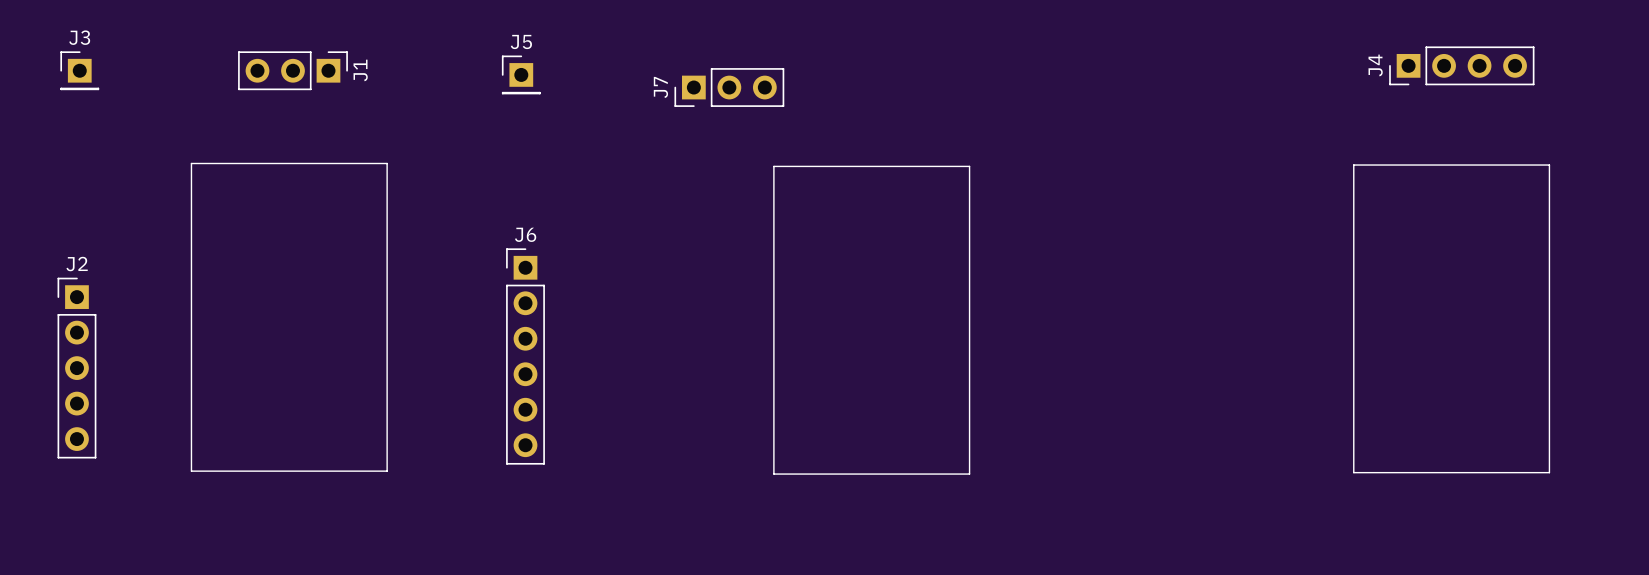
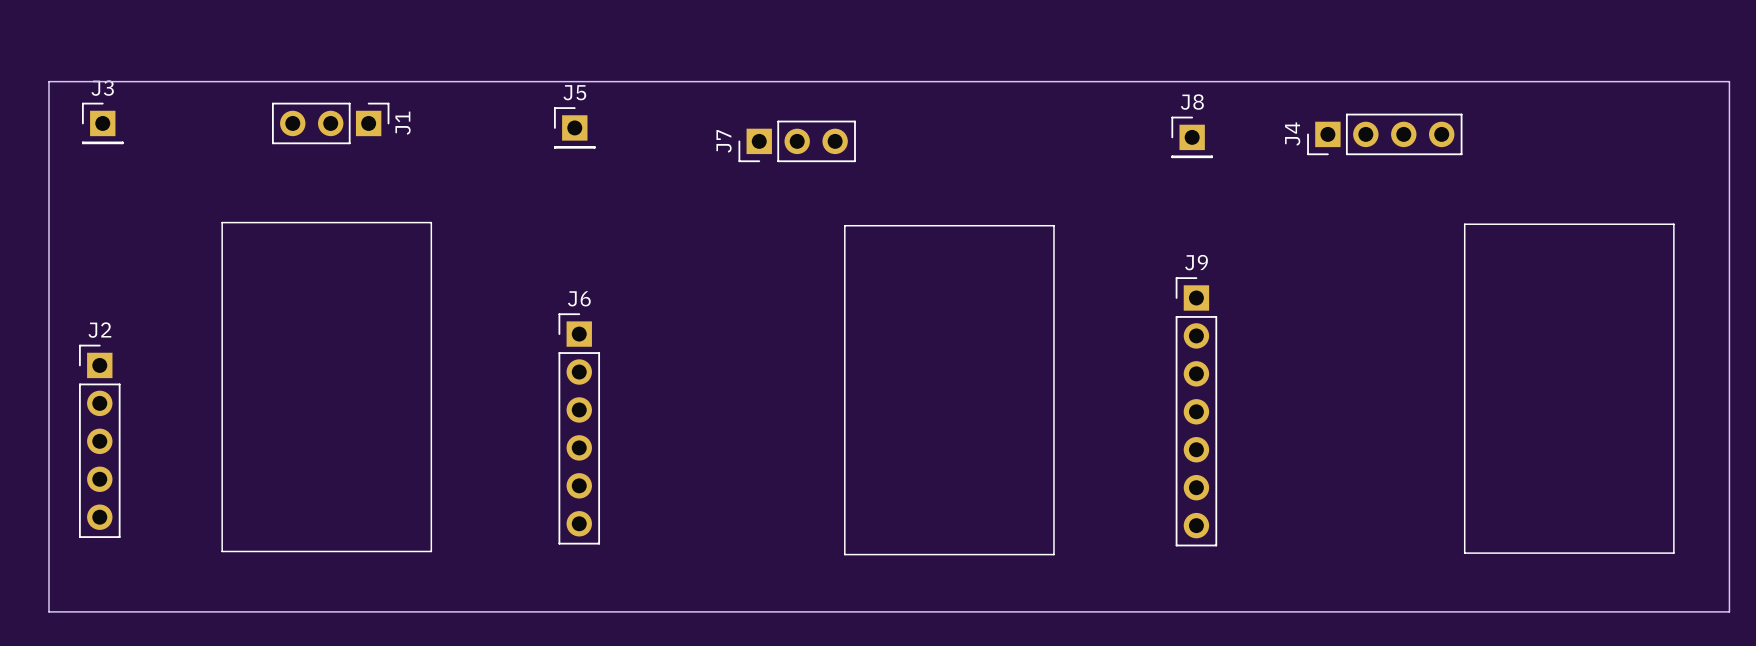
board edge: none -> (48, 81) (1729, 81) (1729, 611) (48, 611) (48, 81)
J4 position: (1461, 65) -> (1384, 134)
J8: none -> (1192, 137)
J9: none -> (1196, 411)

